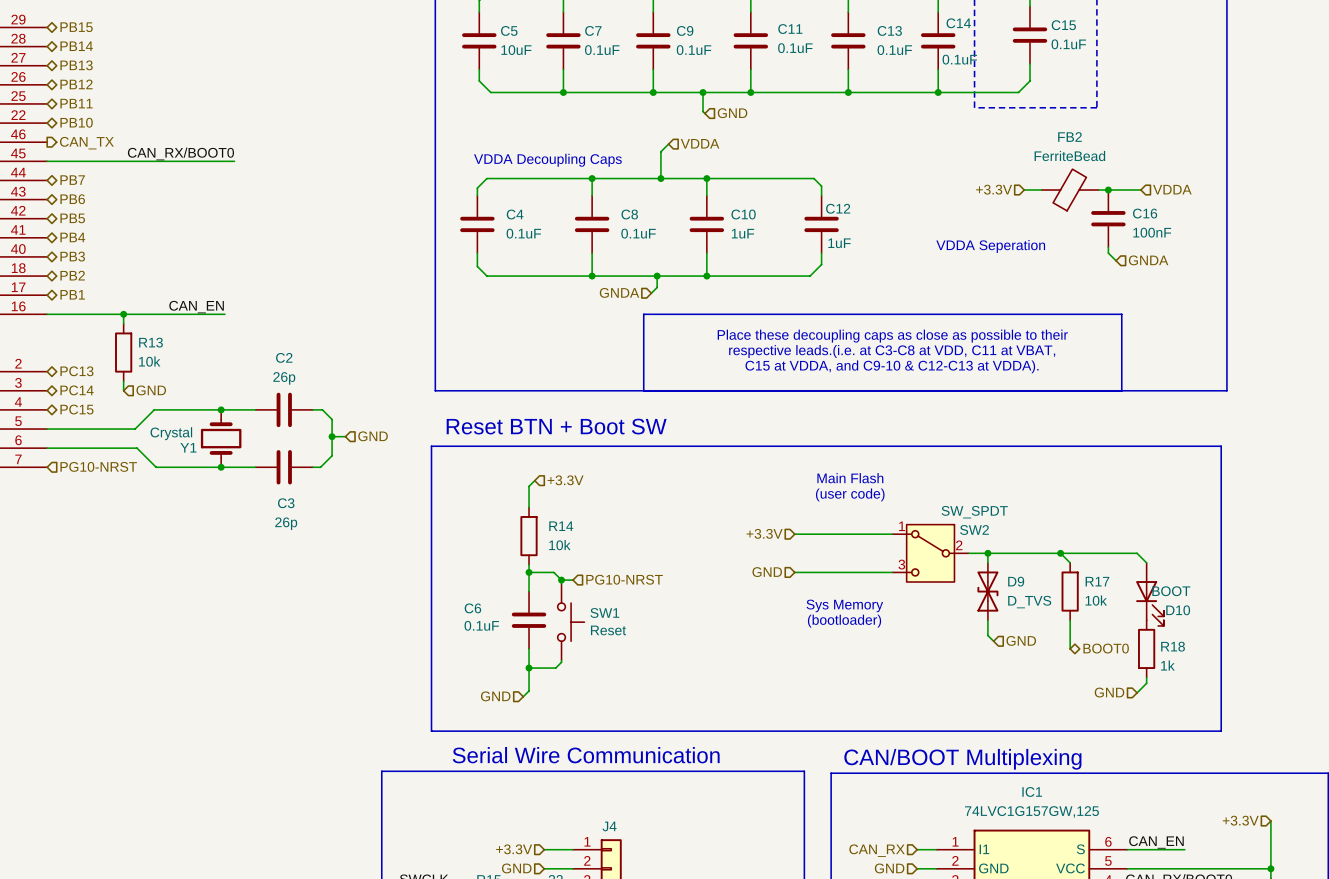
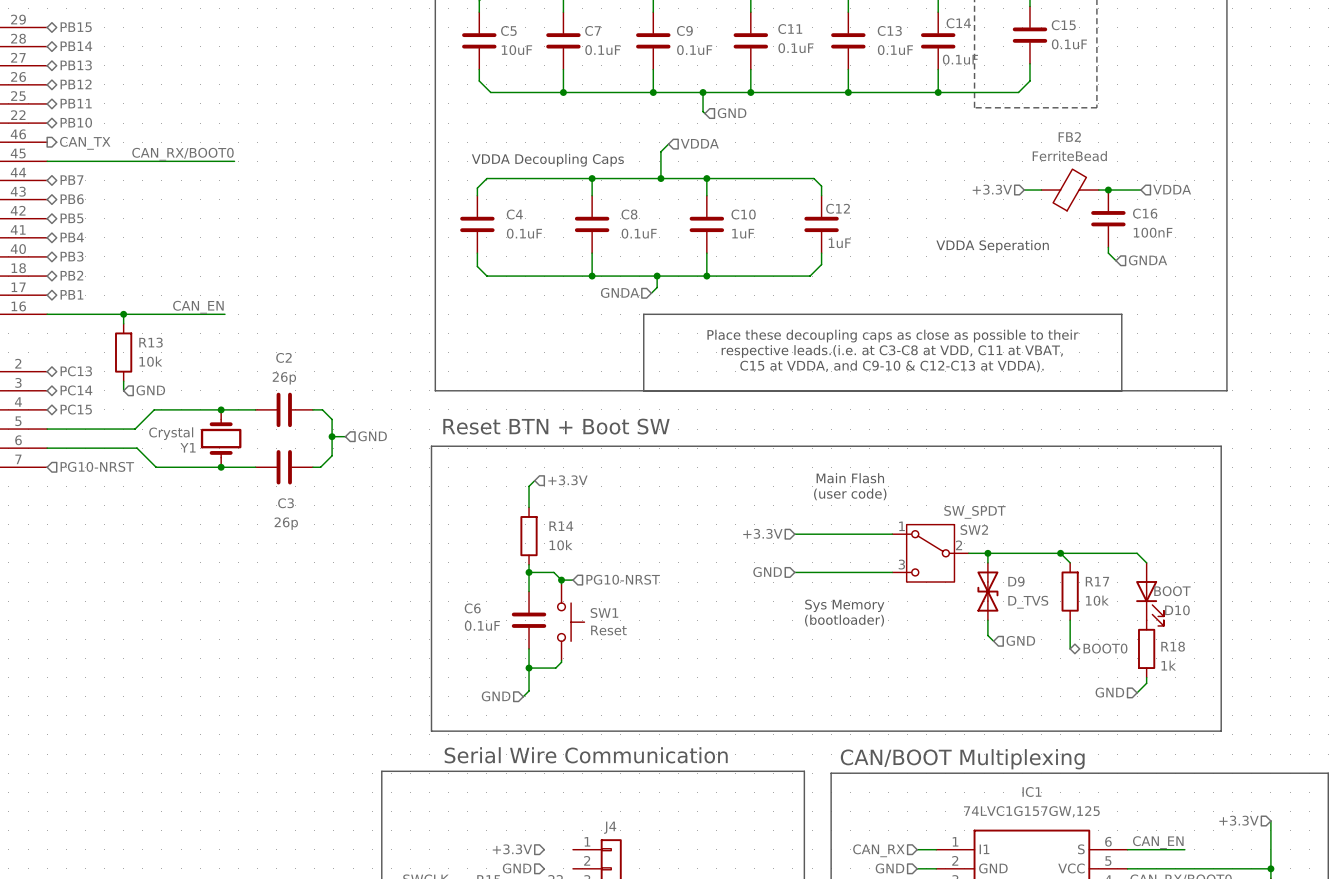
wire: (544, 849) (572, 849) -> none
wire: (544, 868) (572, 868) -> none

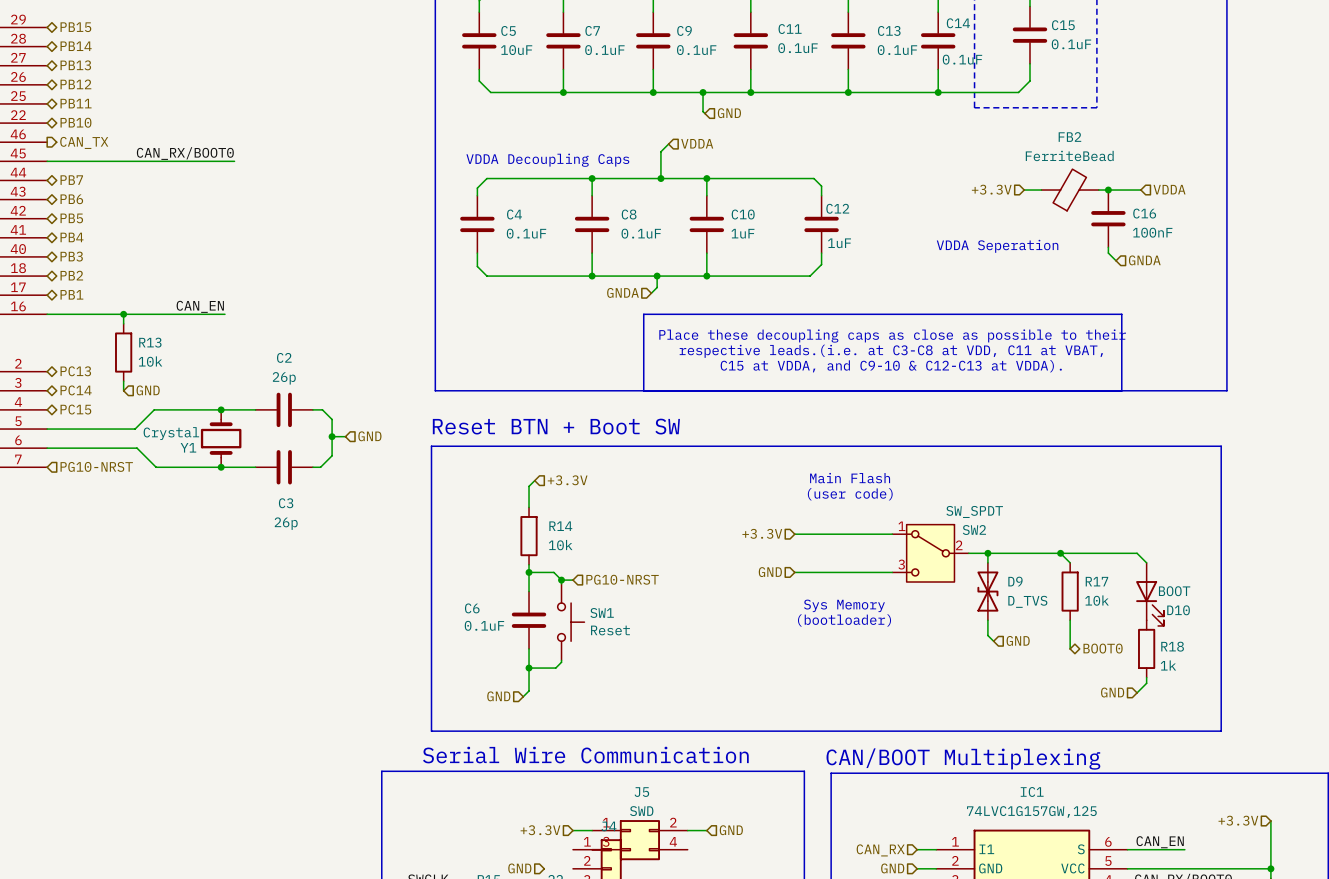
wire: none -> (572, 830) (592, 830)
wire: none -> (687, 830) (706, 830)
hierarchical label: none -> GND (731, 830)
J5: none -> SWD (639, 840)
hierarchical label position: +3.3V (512, 849) -> +3.3V (540, 830)

